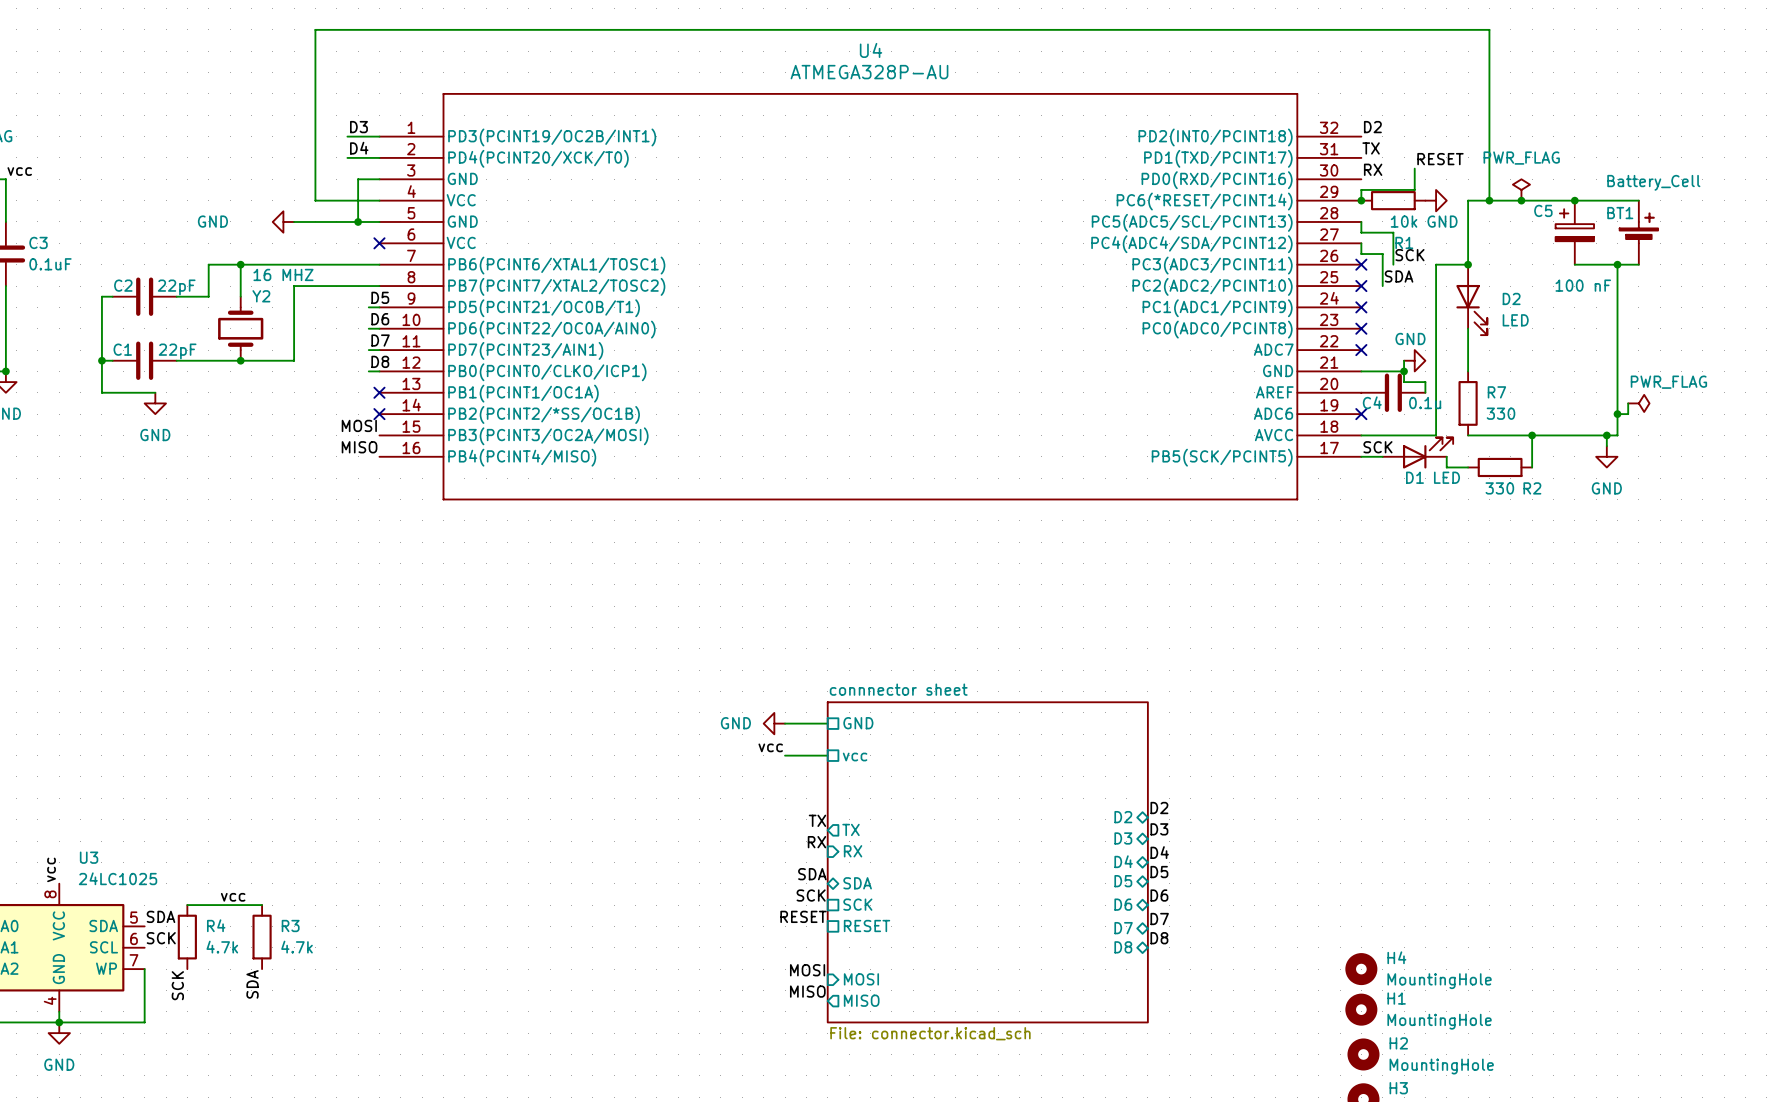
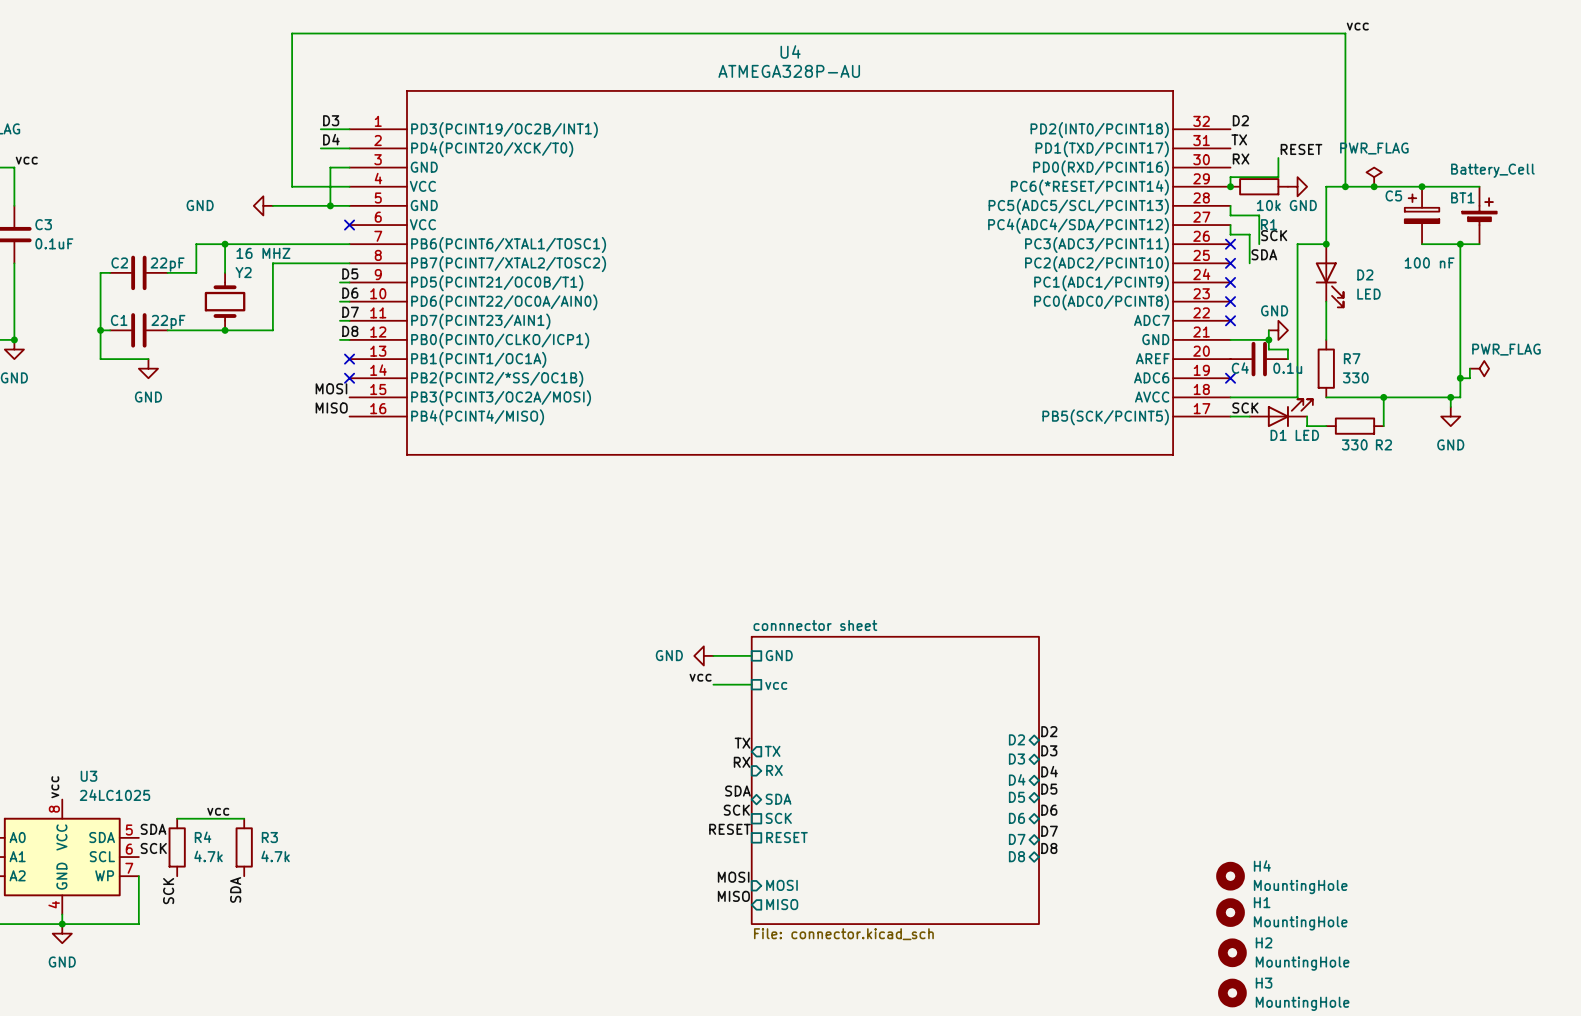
label: none -> vcc (1357, 26)

